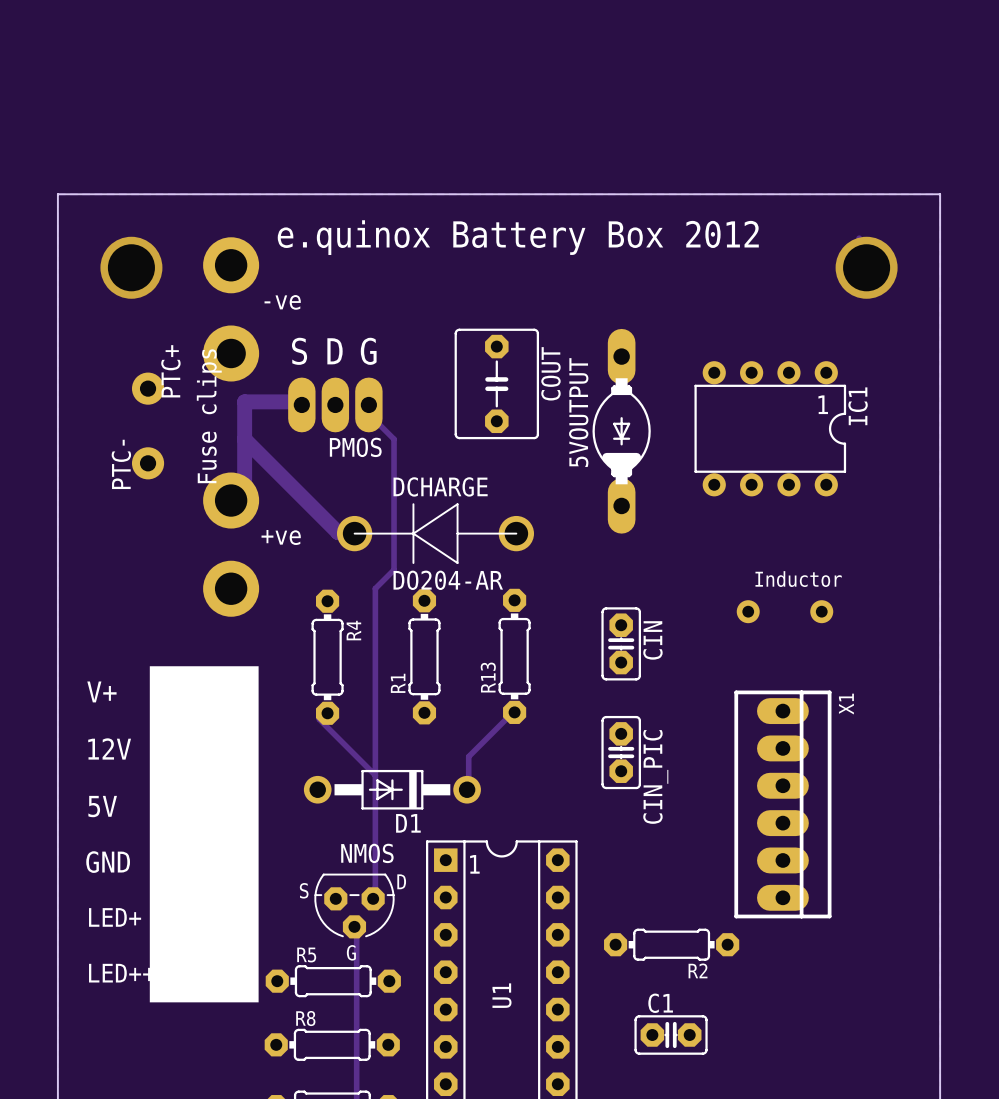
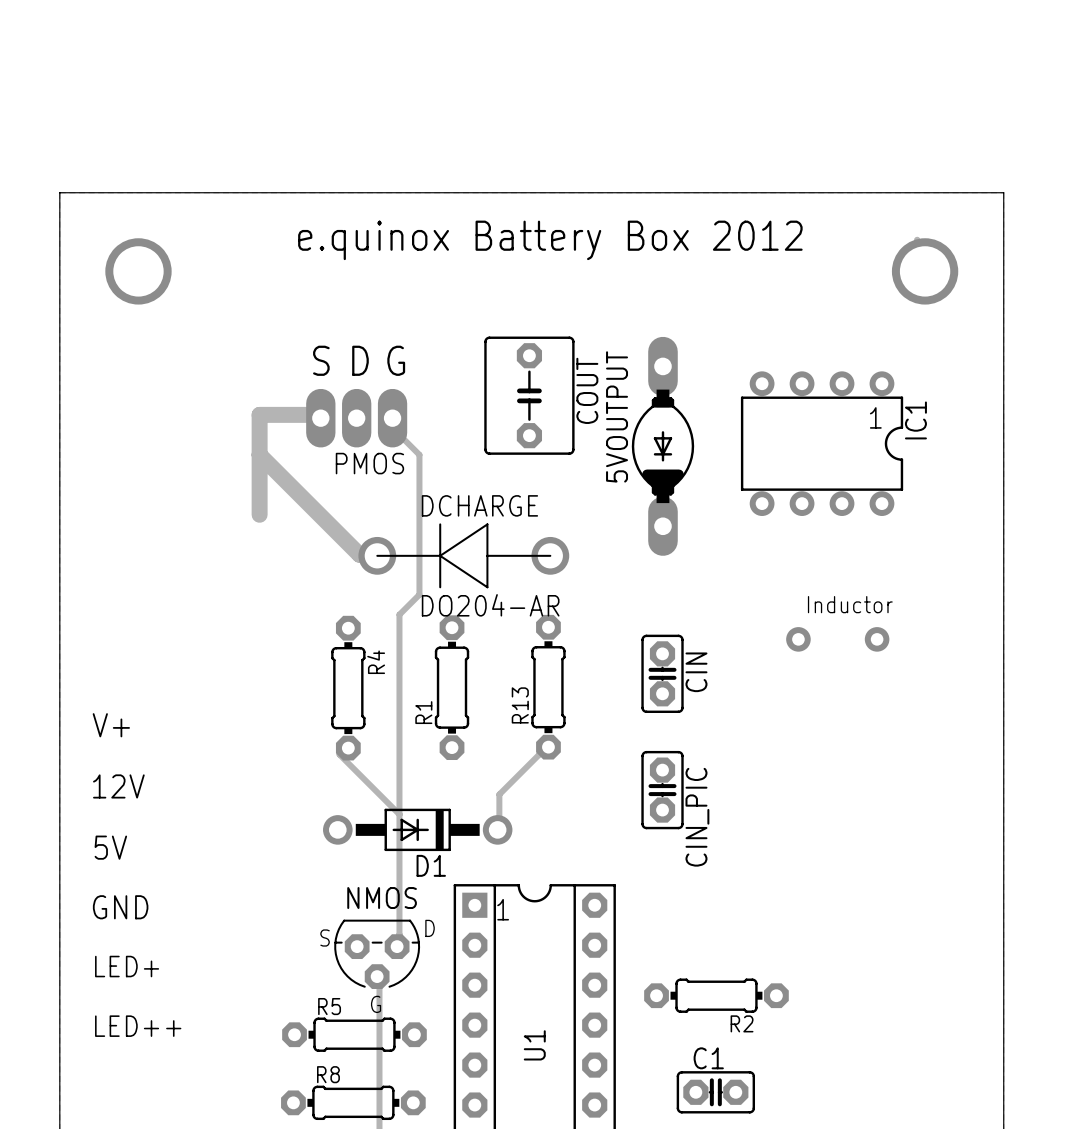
part: (148, 425) -> none
part: (231, 427) -> none
X1: (782, 804) -> none
part: (204, 834) -> none

